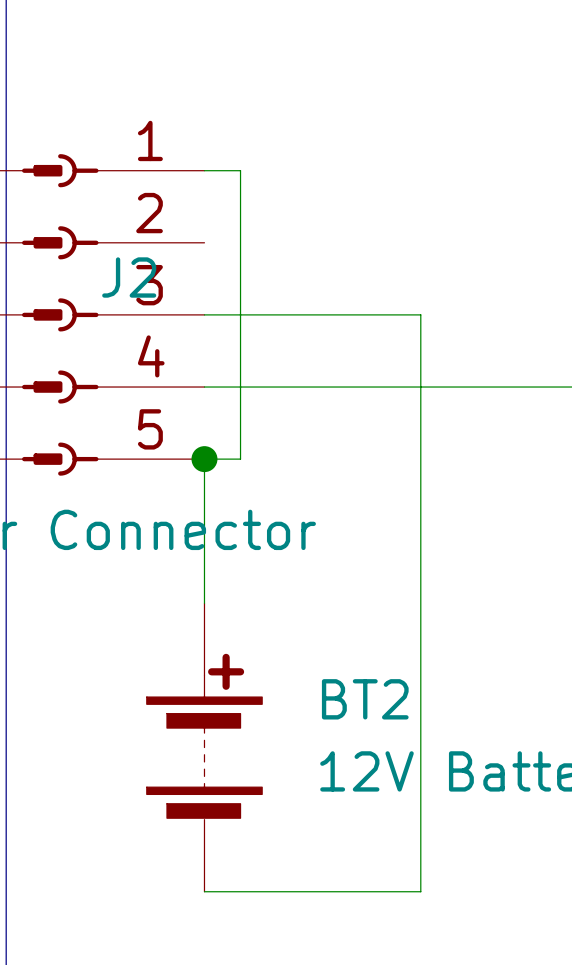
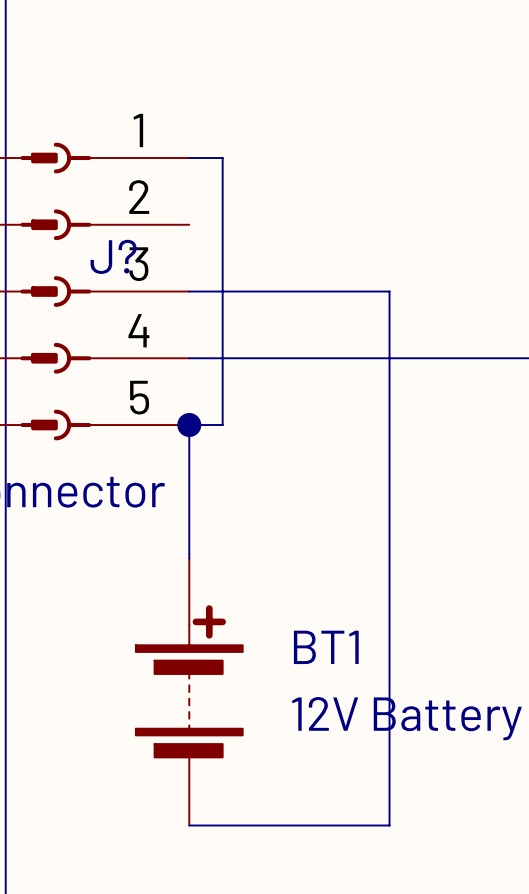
J2 name: J2 (129, 277) -> J? (113, 256)
BT2 name: BT2 (365, 699) -> BT1 (326, 647)

